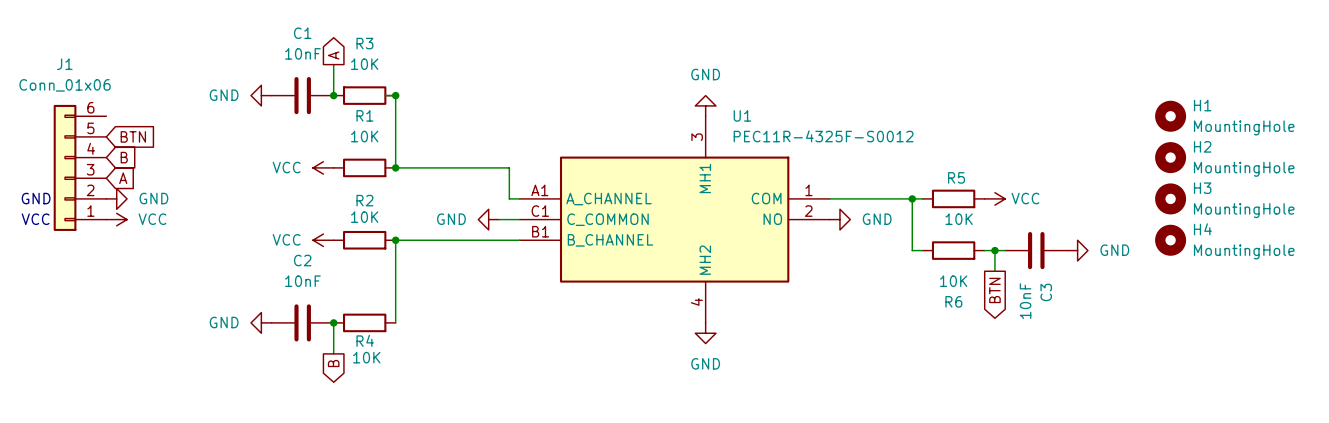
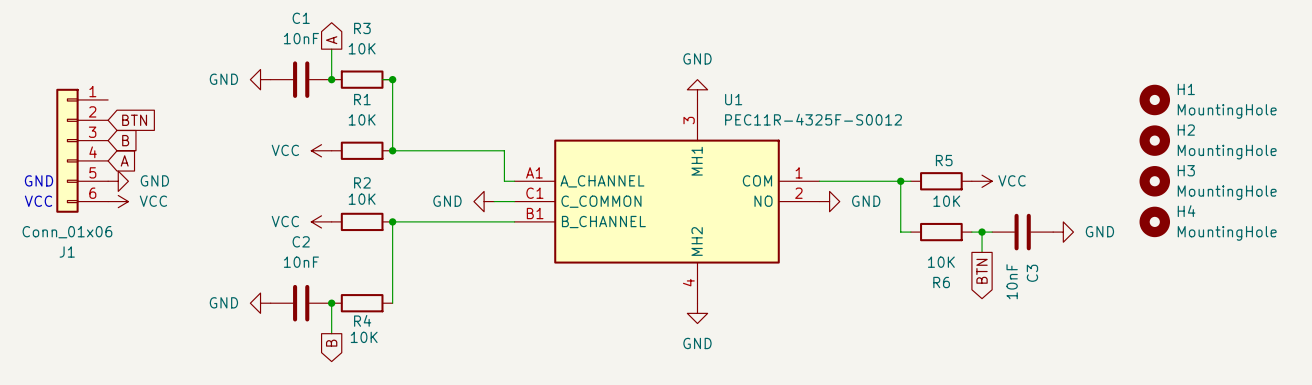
J1 flip: as is (65, 167) -> up-down (67, 150)

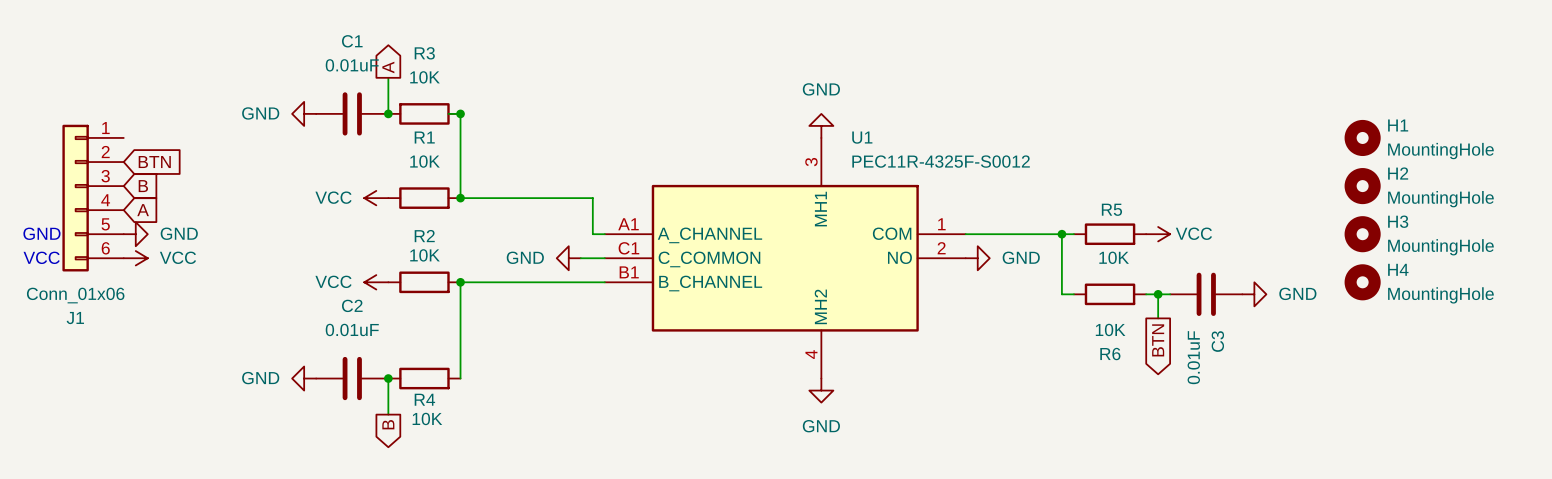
C1 value: 10nF (301, 38) -> 0.01uF (352, 65)
C2 value: 10nF (301, 262) -> 0.01uF (352, 329)
C3 value: 10nF (1012, 281) -> 0.01uF (1193, 357)

